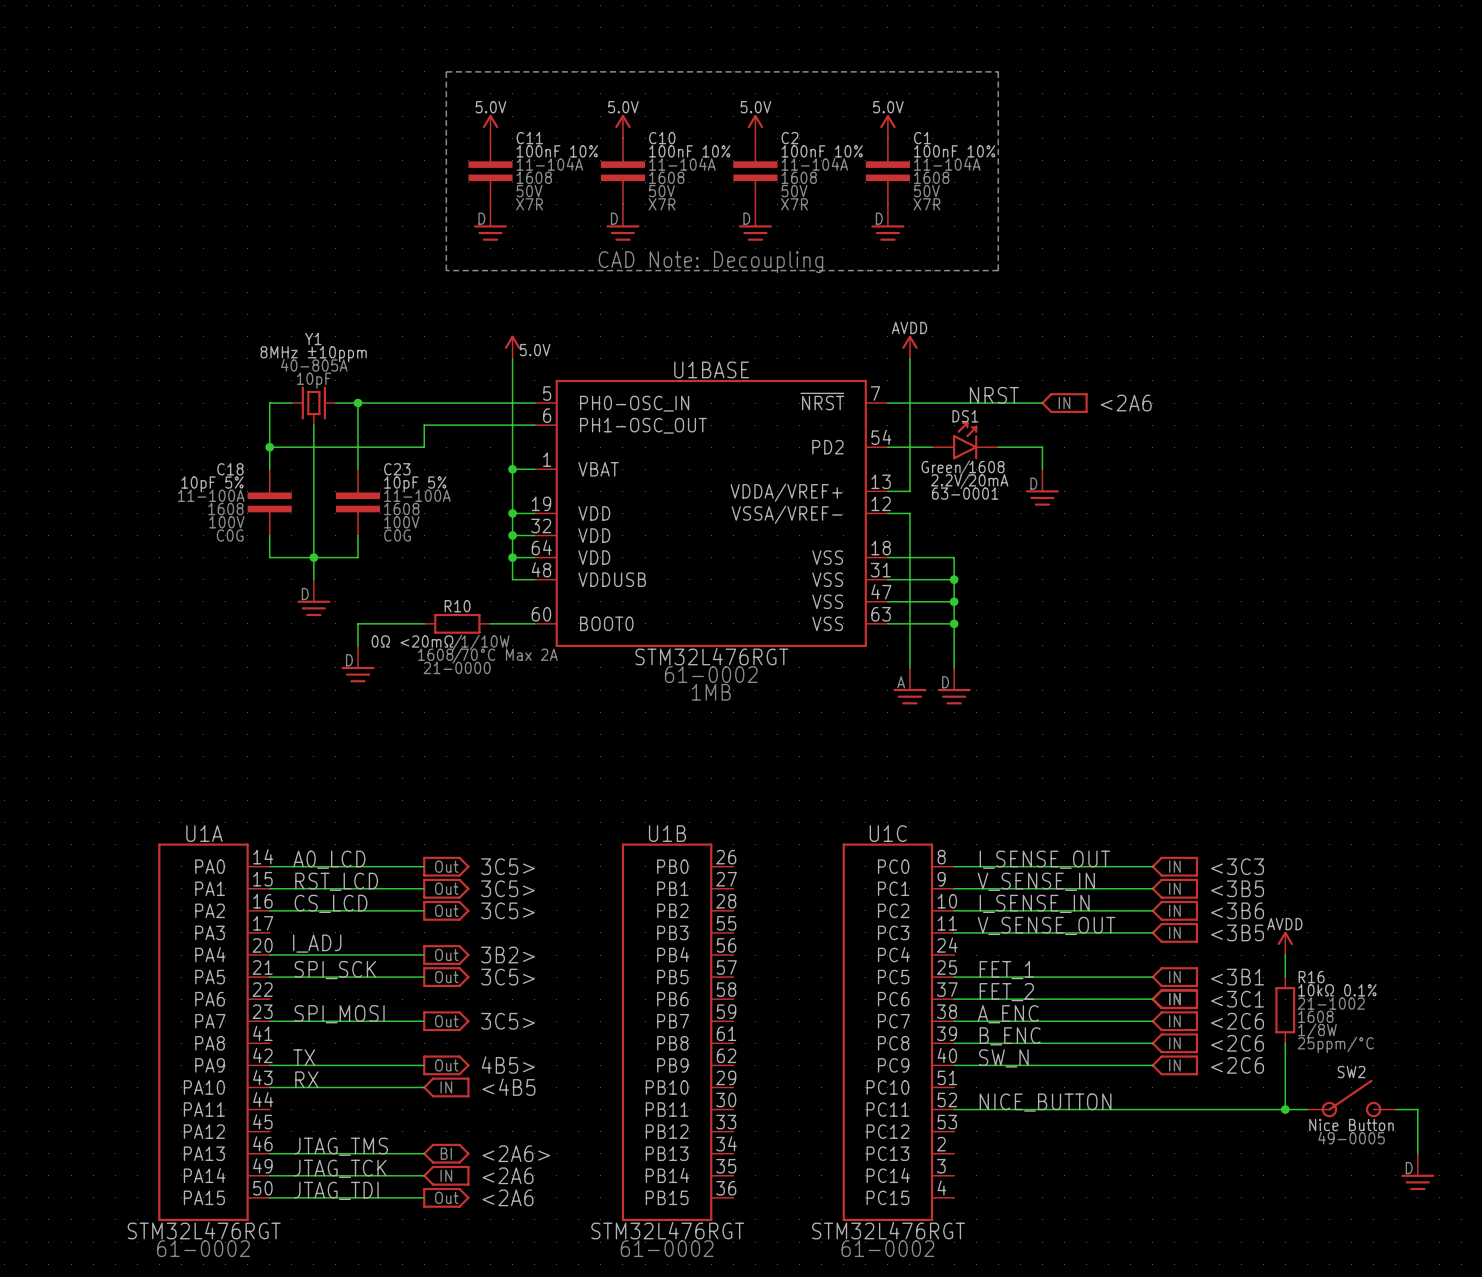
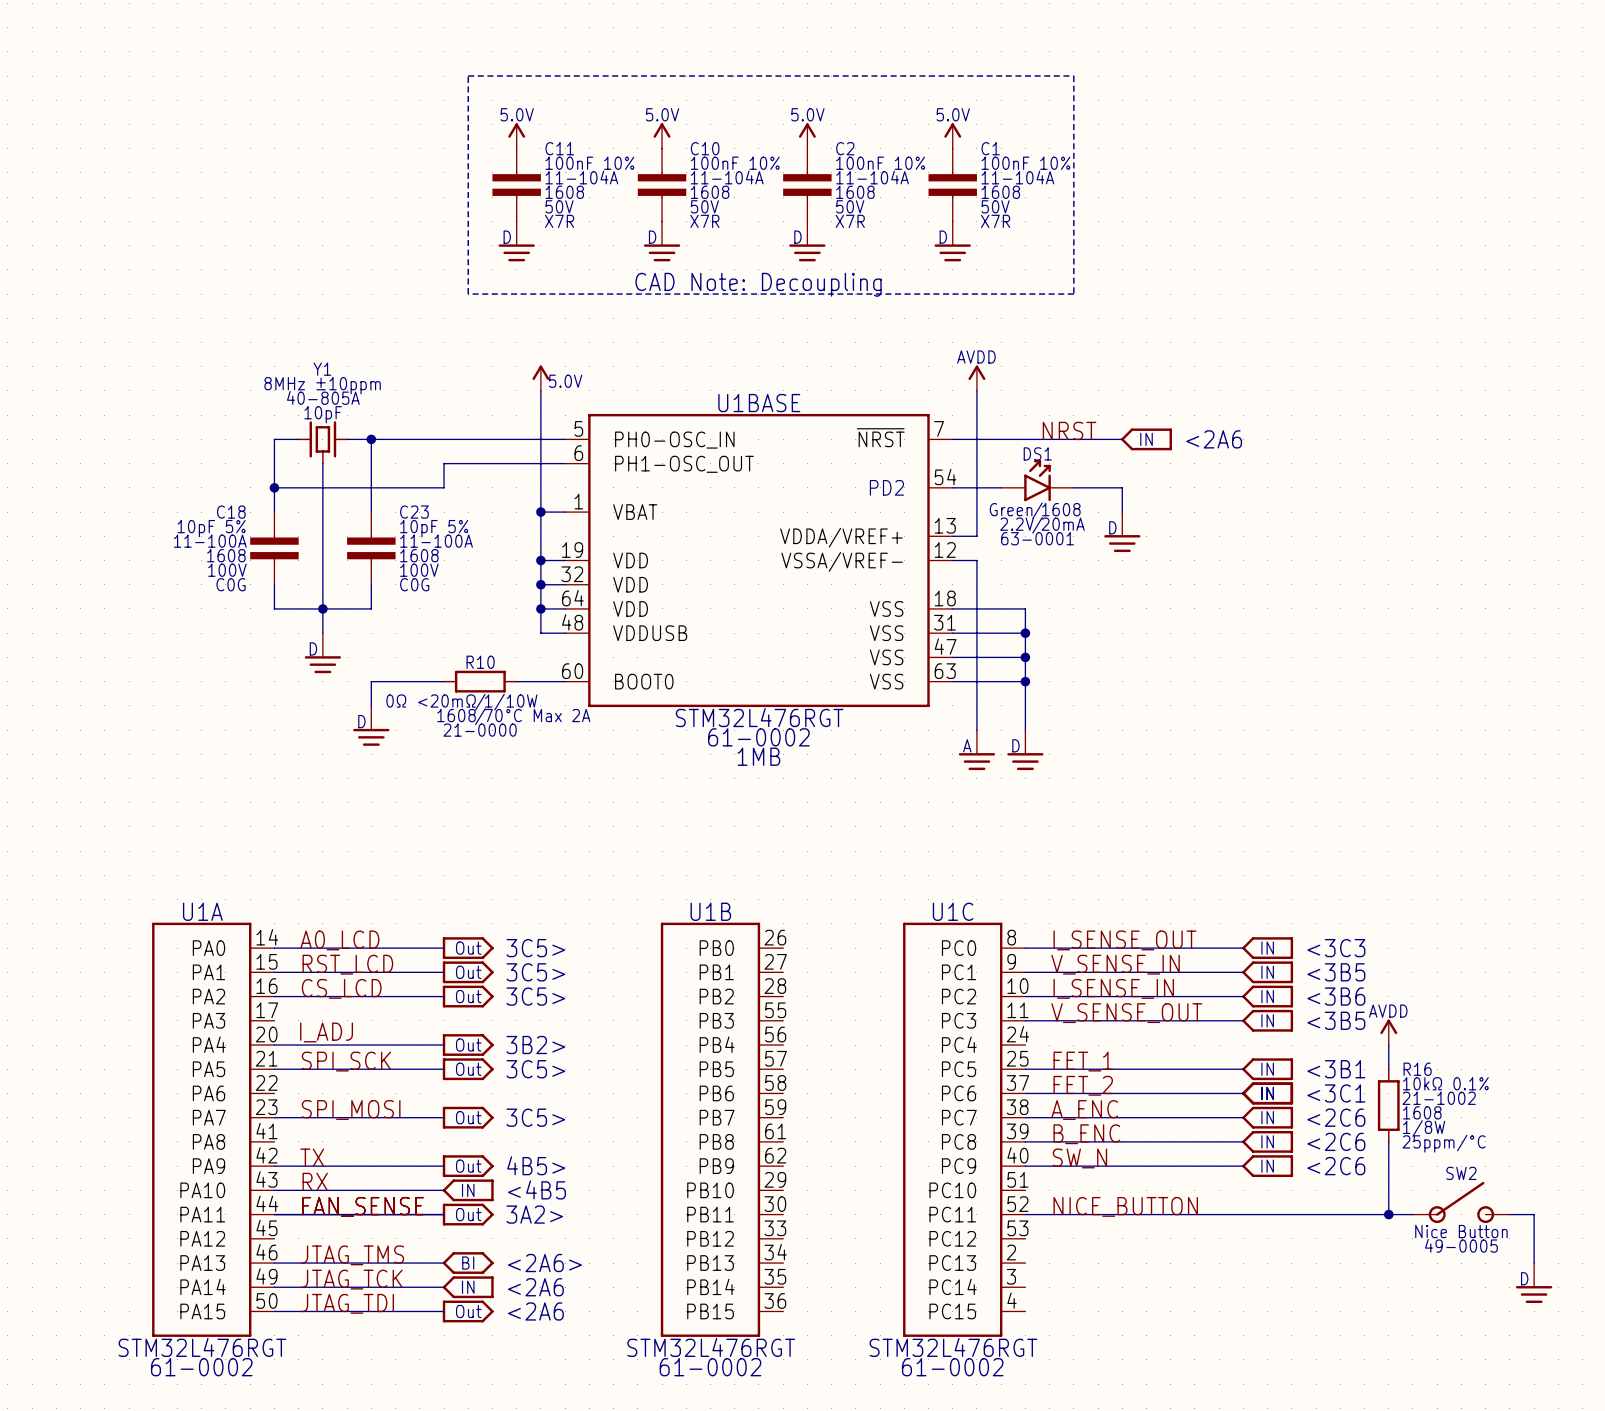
label: none -> FAN_SENSE (363, 1206)
wire: none -> (274, 1214) (444, 1214)
part: none -> (468, 1214)
text: none -> 3A2> (534, 1214)

